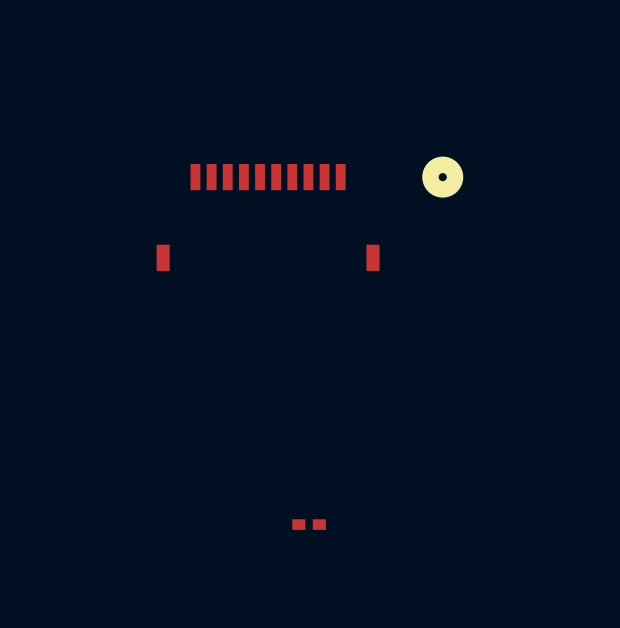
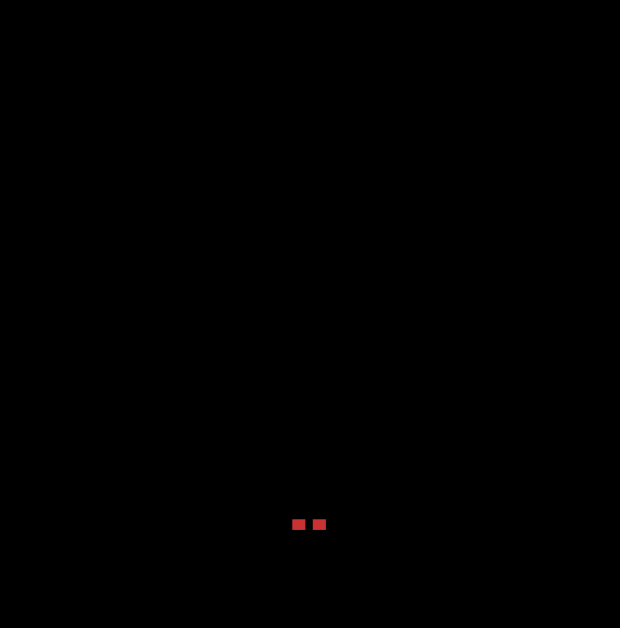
part: (309, 213) -> none

